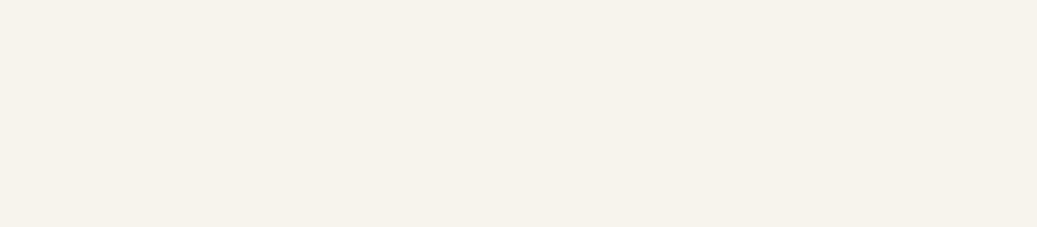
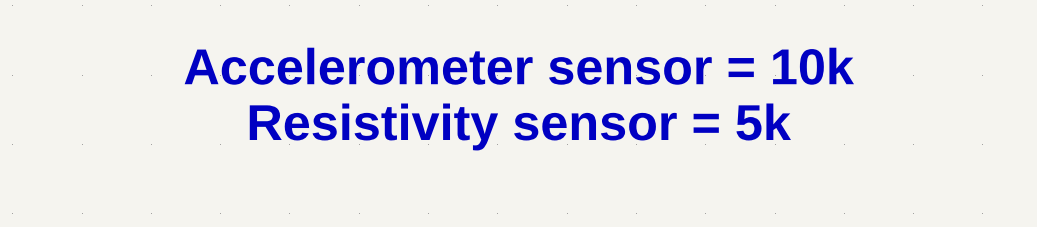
text: none -> Accelerometer sensor = 10k (519, 66)
text: none -> Resistivity sensor = 5k (520, 126)

